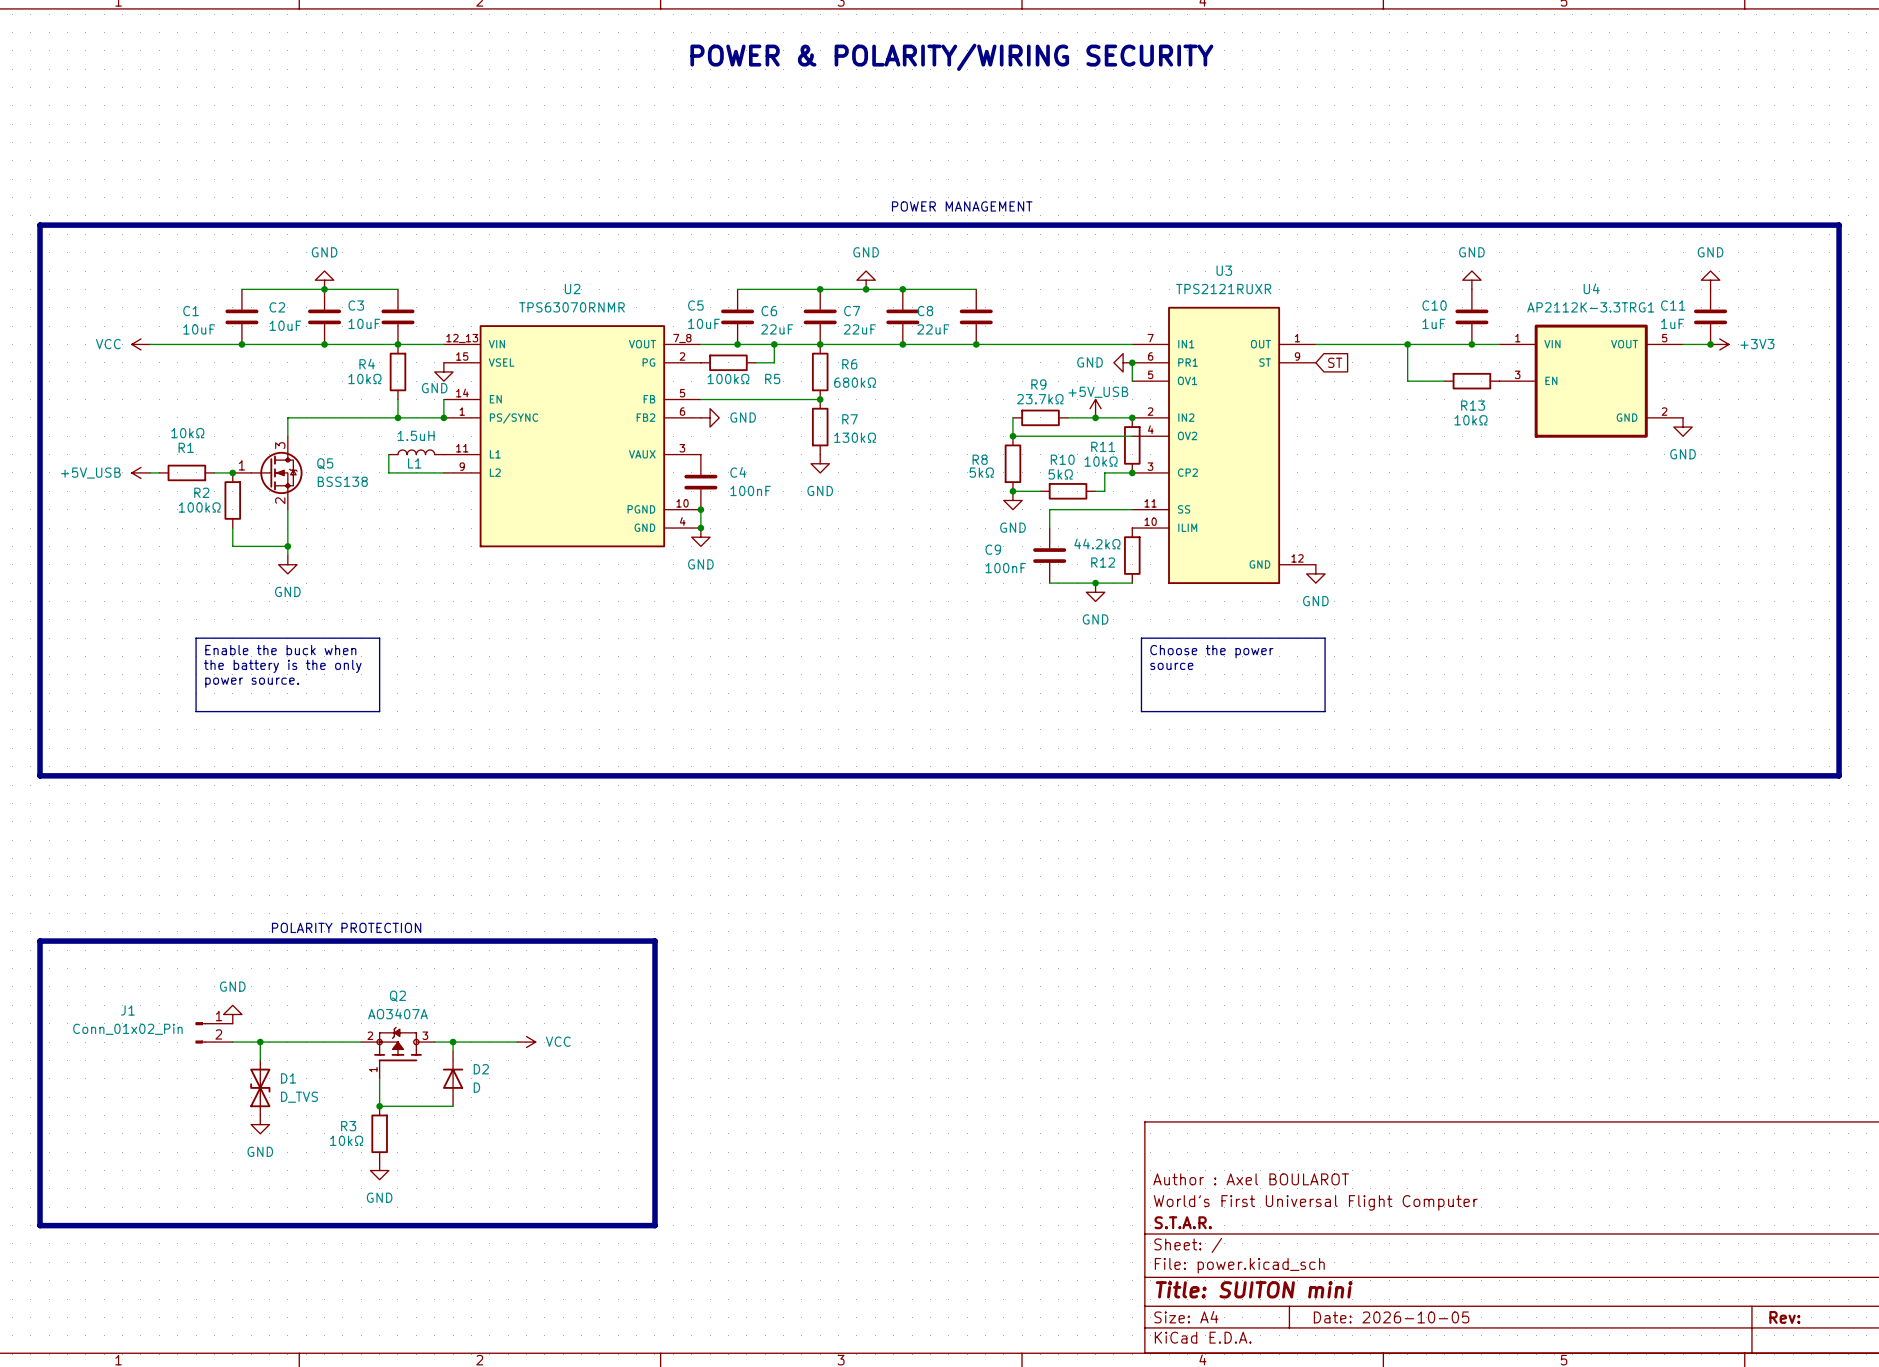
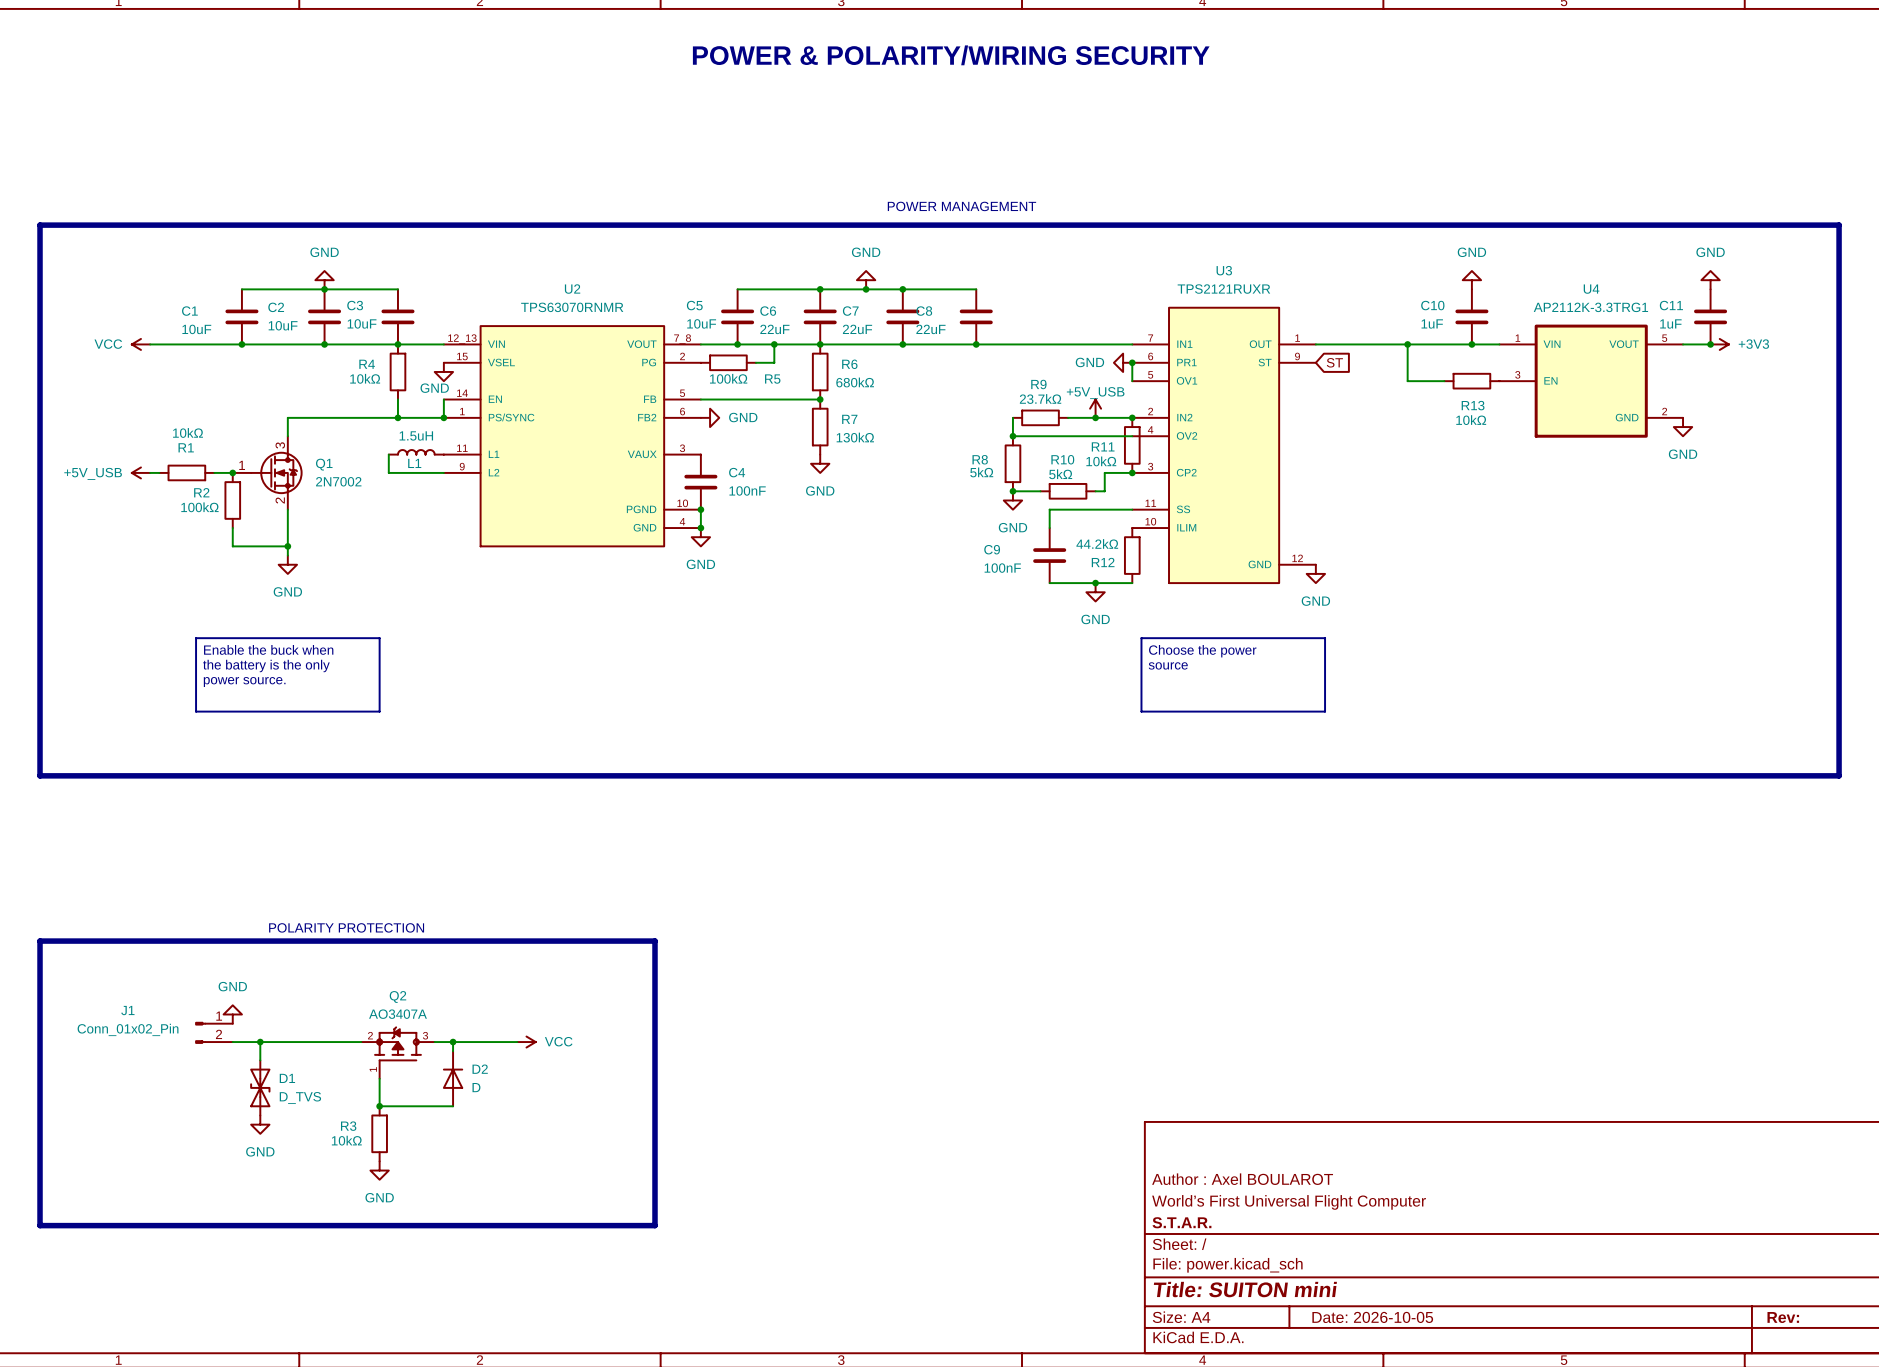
Q5 name: Q5 (325, 463) -> Q1 (324, 464)
Q5 value: BSS138 (342, 481) -> 2N7002 (338, 481)

